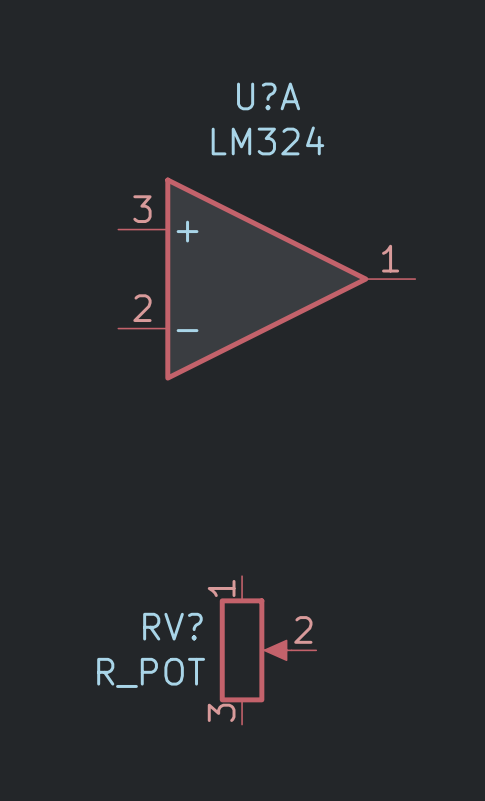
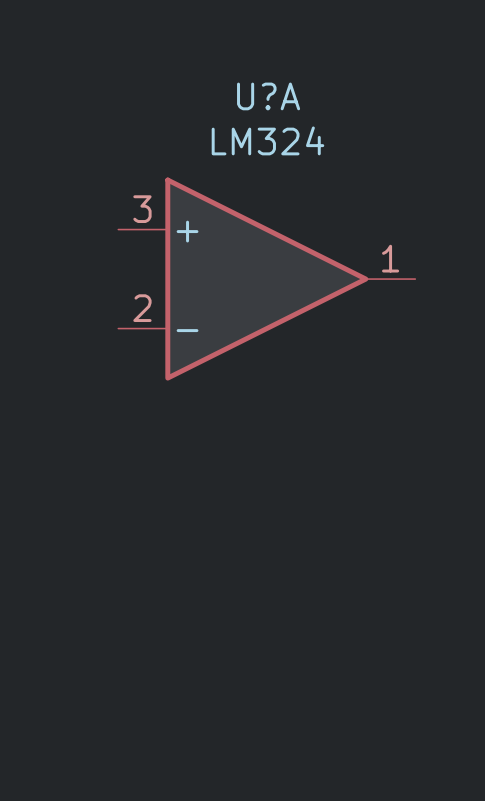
RV?: R_POT (268, 650) -> none

